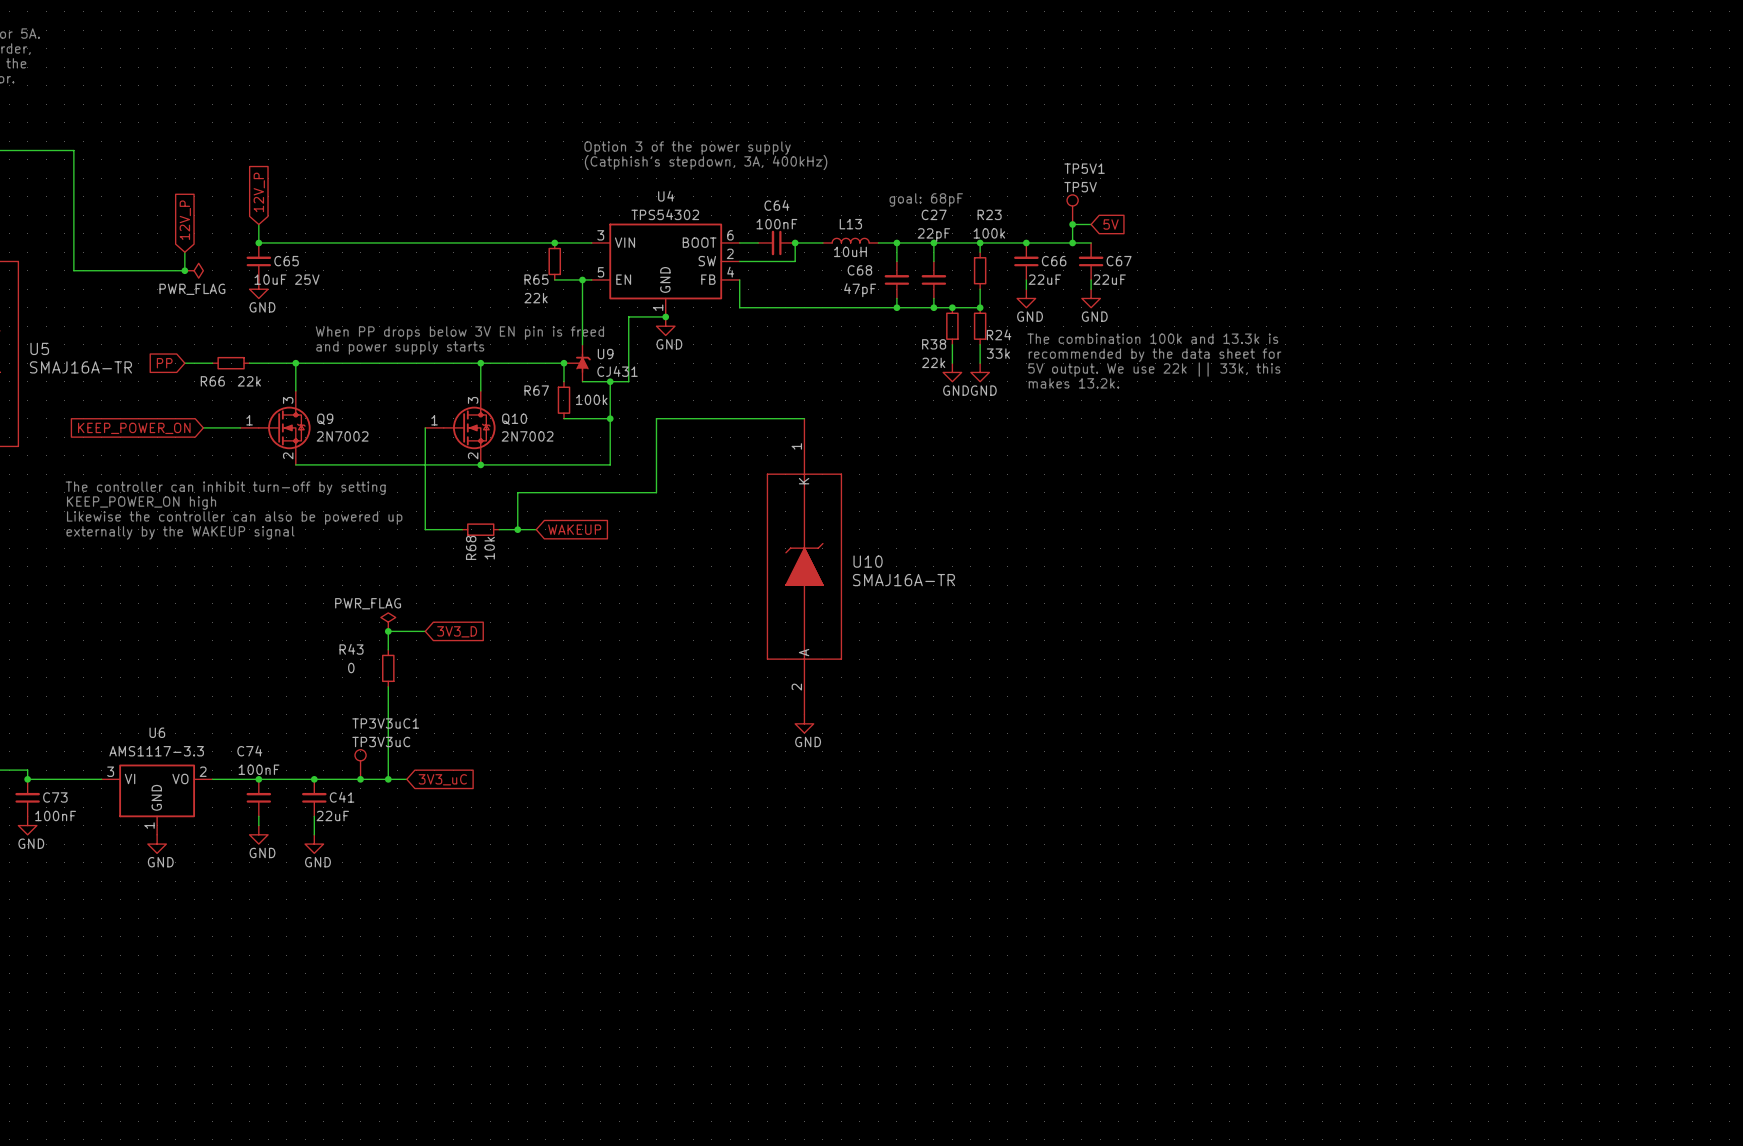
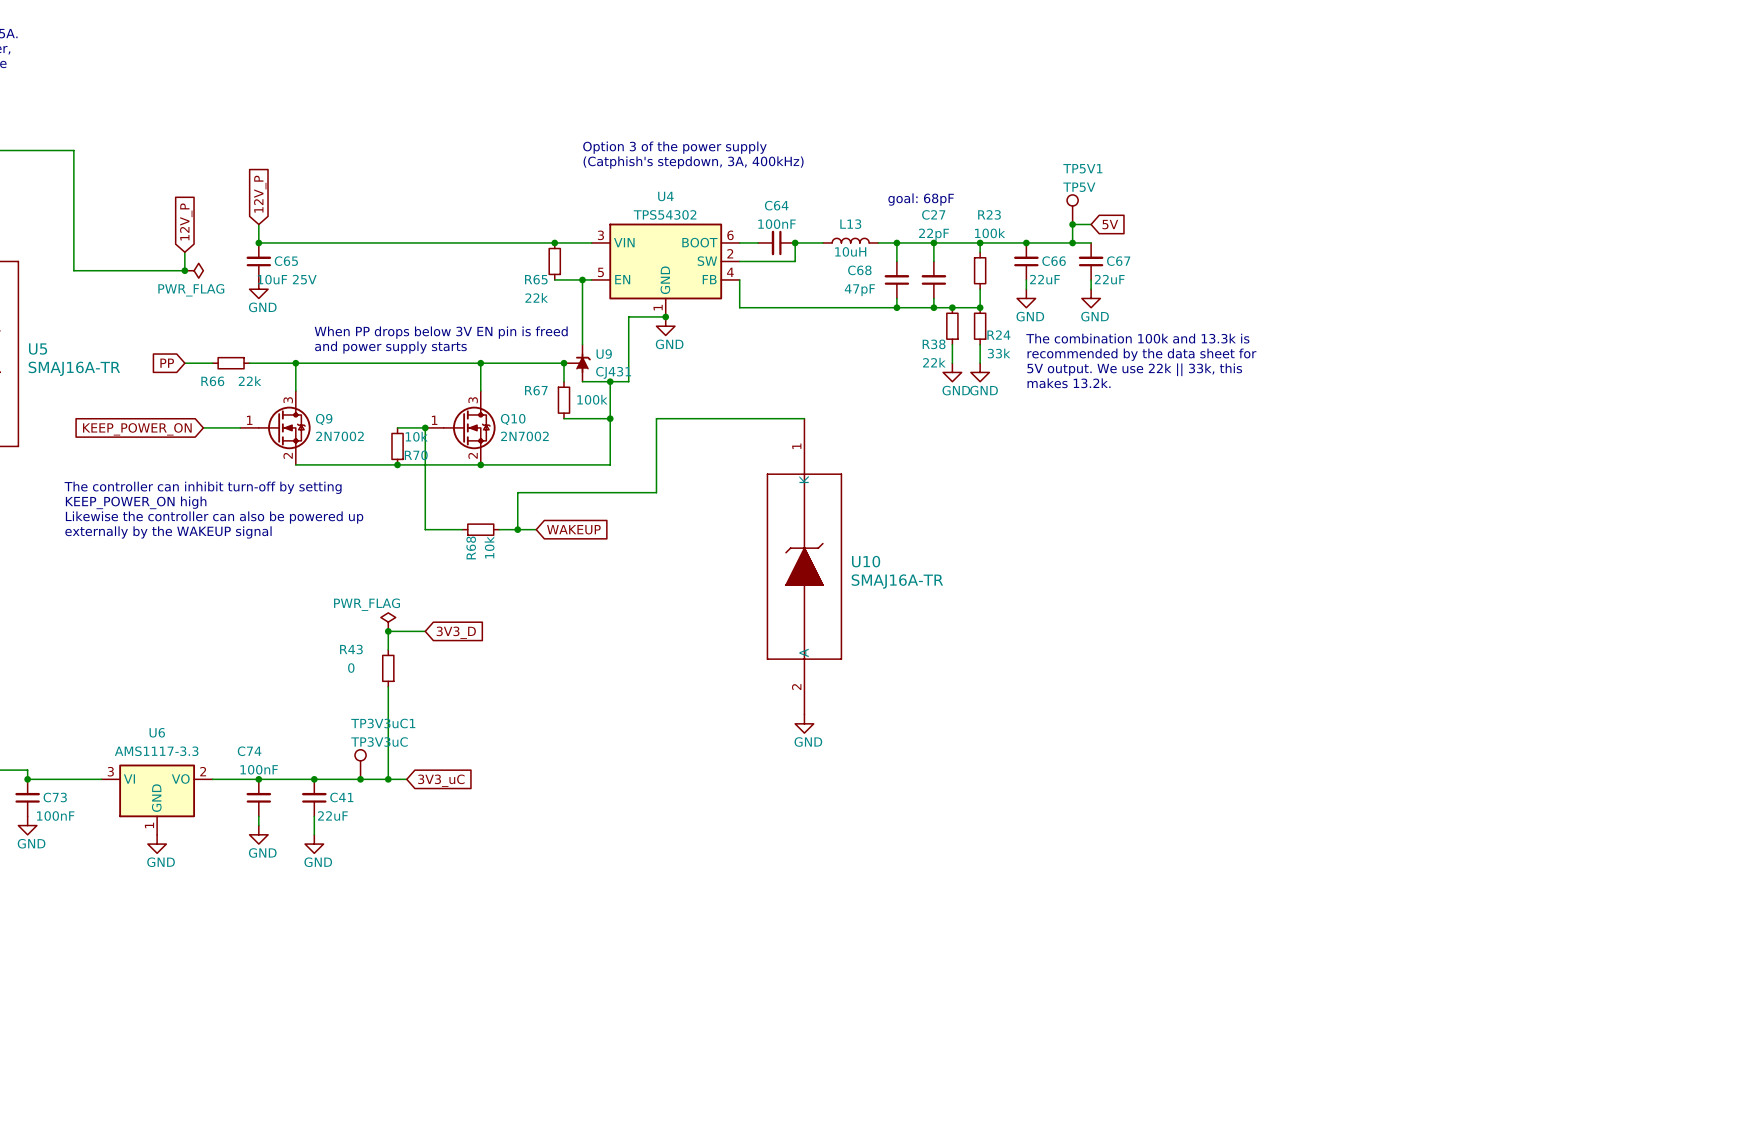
wire: none -> (397, 427) (425, 427)
junction: none -> (425, 427)
R70: none -> 10k (397, 446)
junction: none -> (397, 464)

